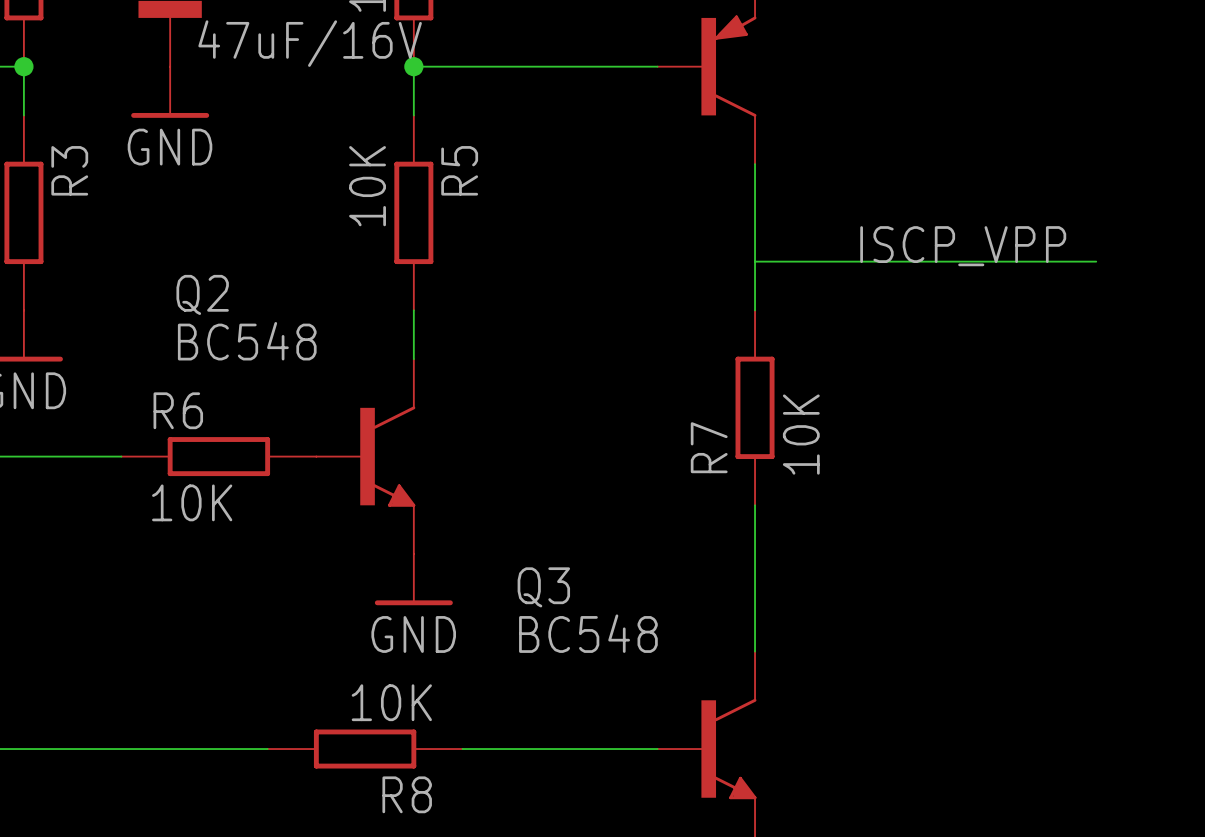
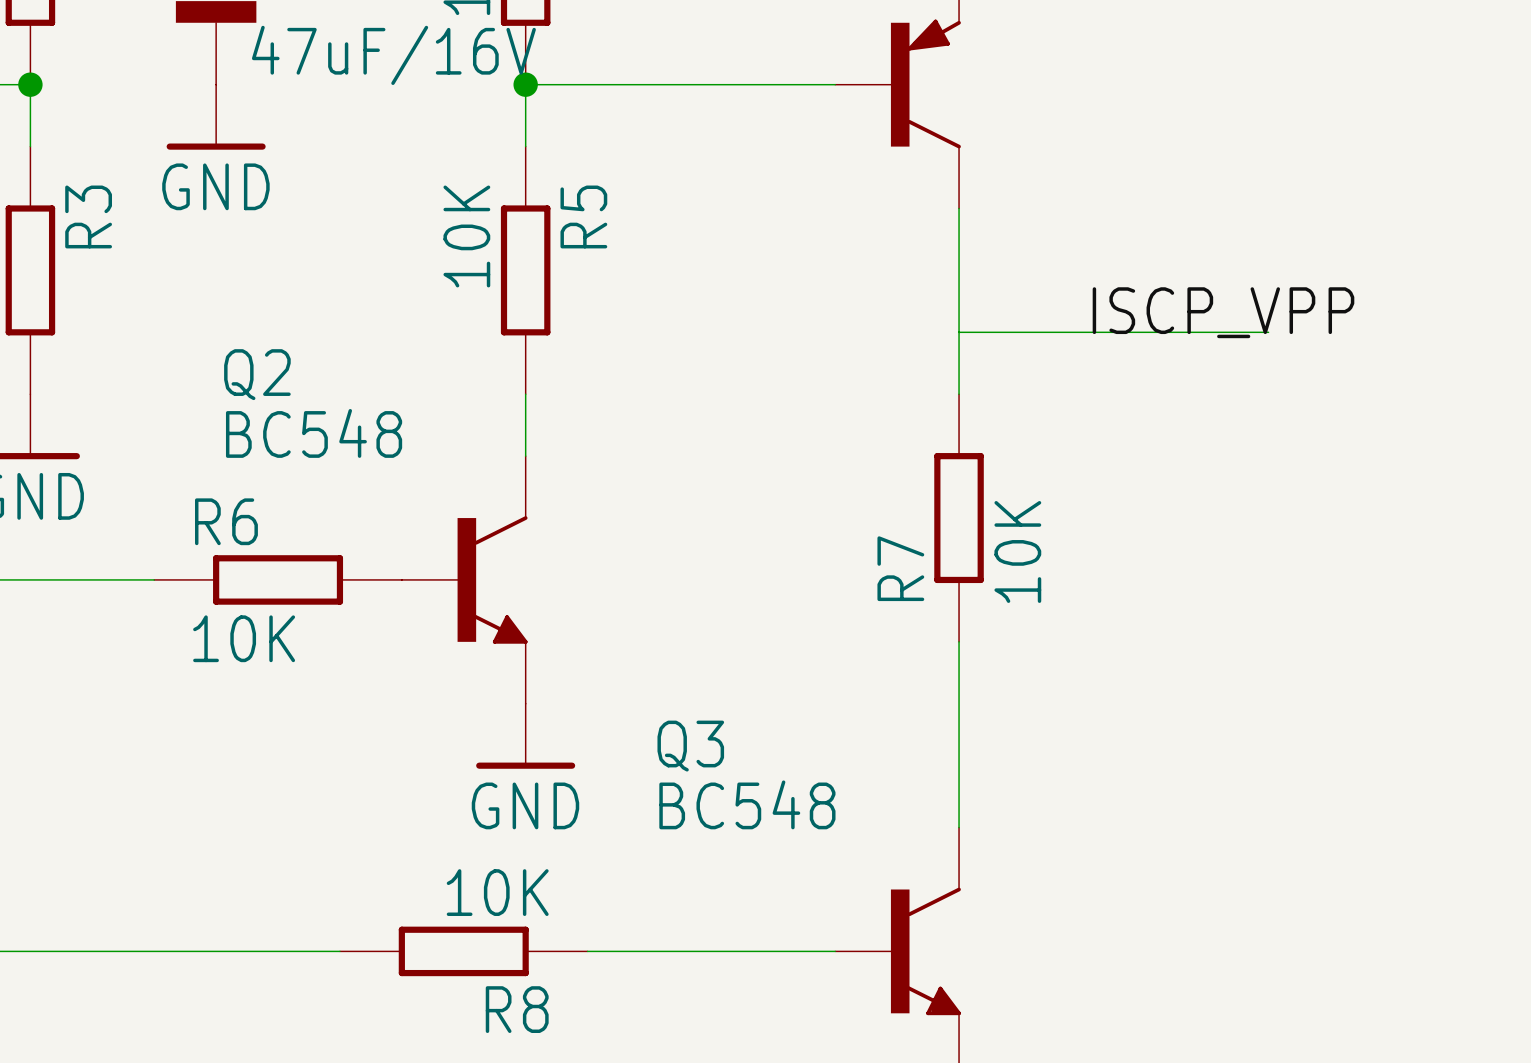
wire: (998, 261) (1096, 261) -> none

